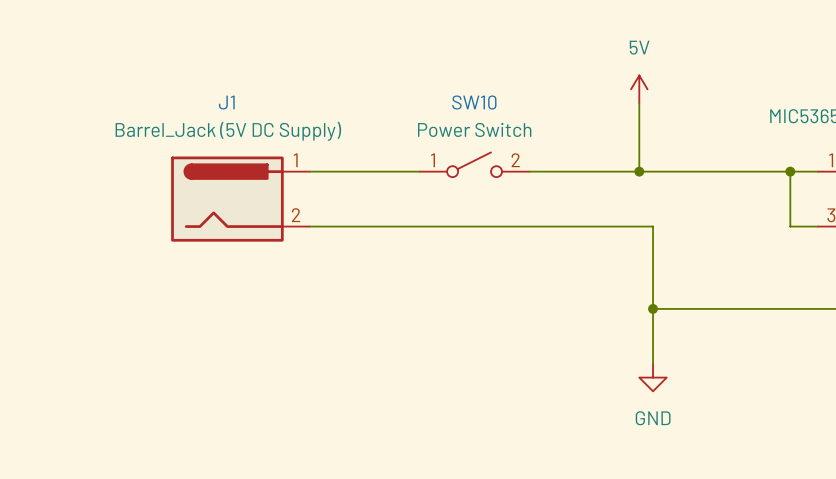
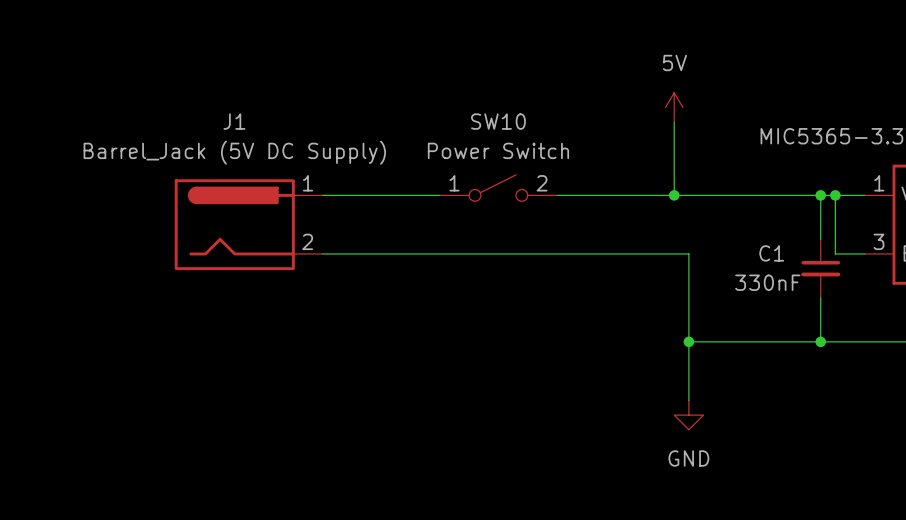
wire: none -> (820, 195) (820, 239)
junction: none -> (820, 195)
C1: none -> 330nF (820, 268)
wire: none -> (820, 297) (820, 341)
junction: none -> (820, 341)

